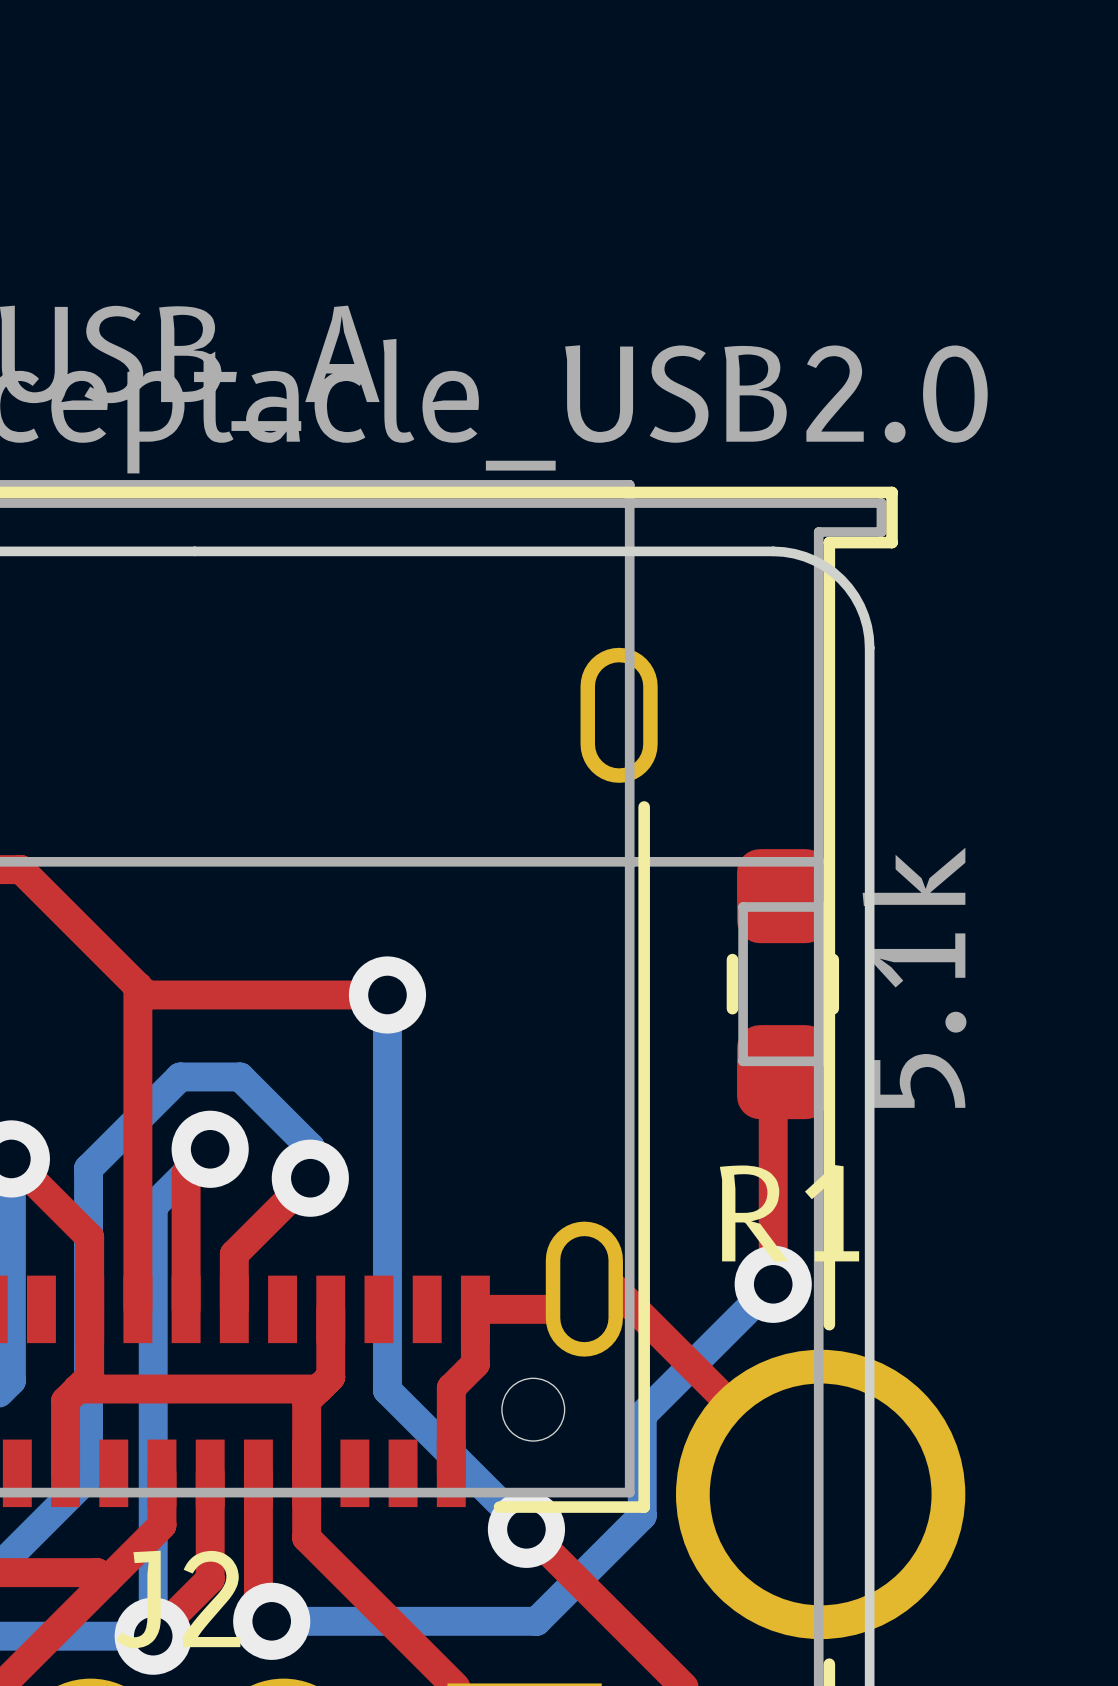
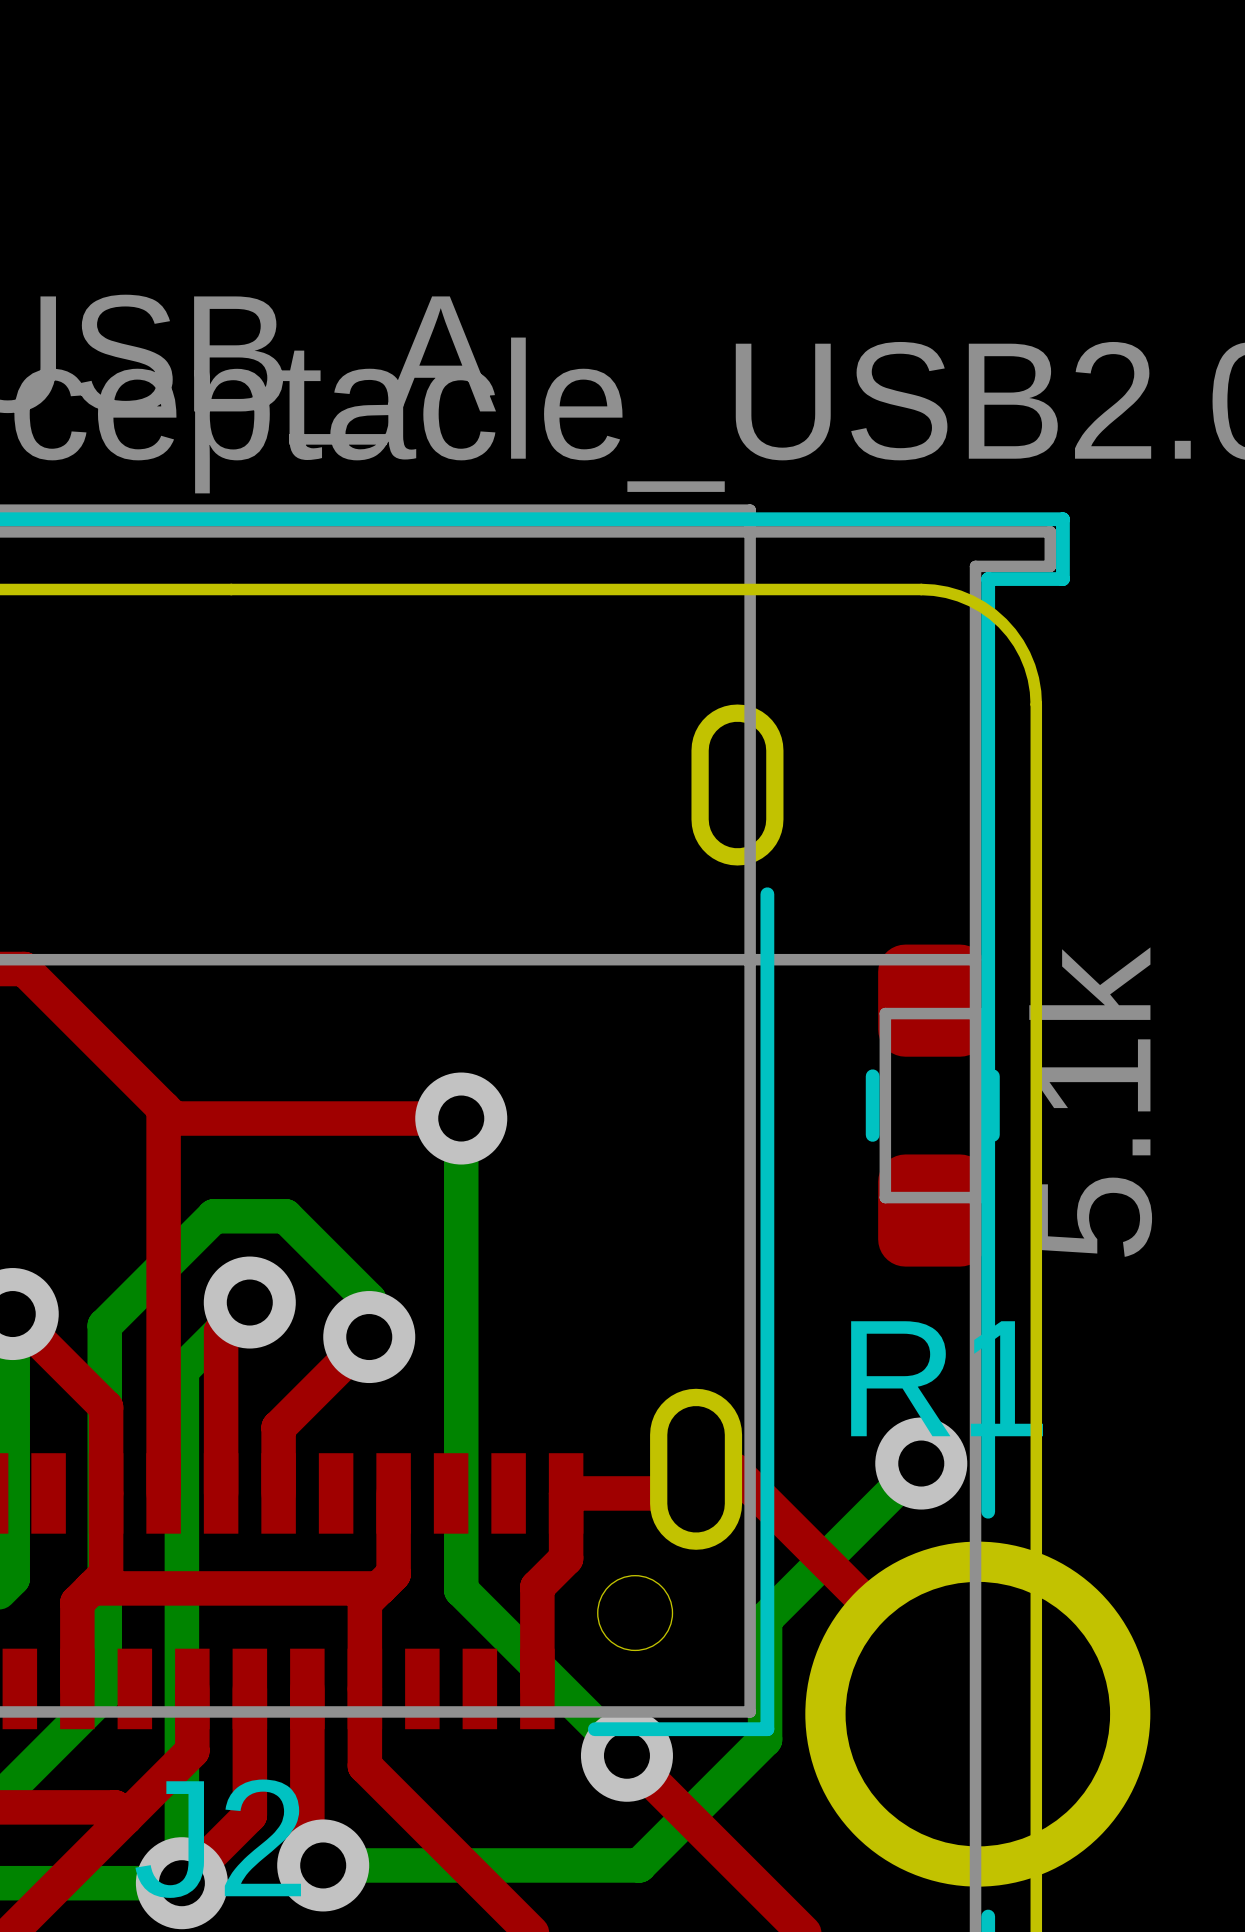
top track: (782, 1072) (773, 1081) (773, 1284) -> none

